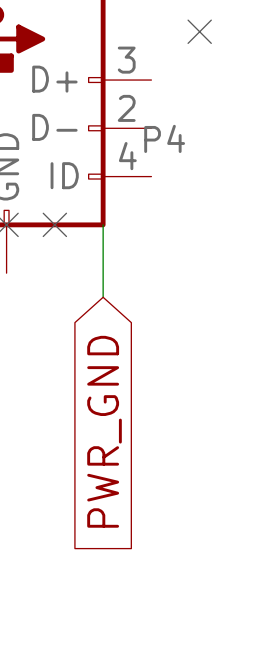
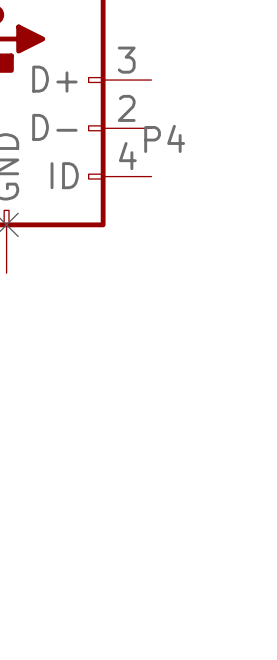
no-connect mark: (199, 31) -> none
no-connect mark: (54, 224) -> none
wire: (103, 224) (103, 297) -> none
global label: PWR_GND (104, 431) -> none

